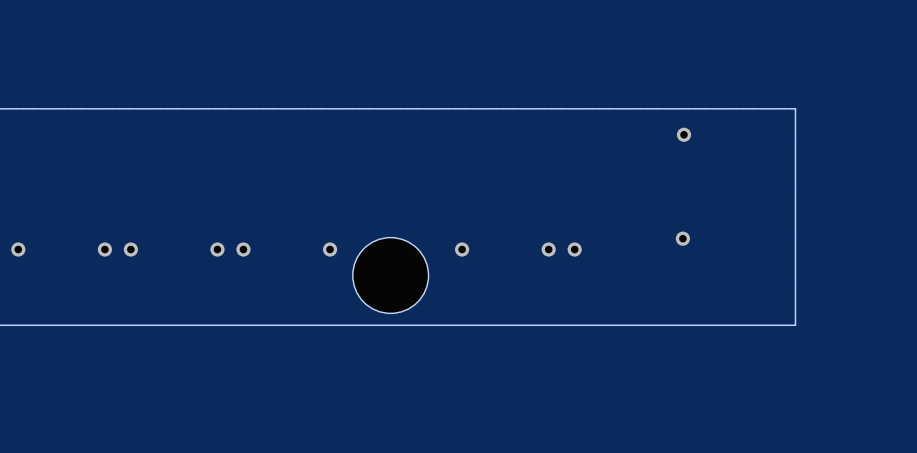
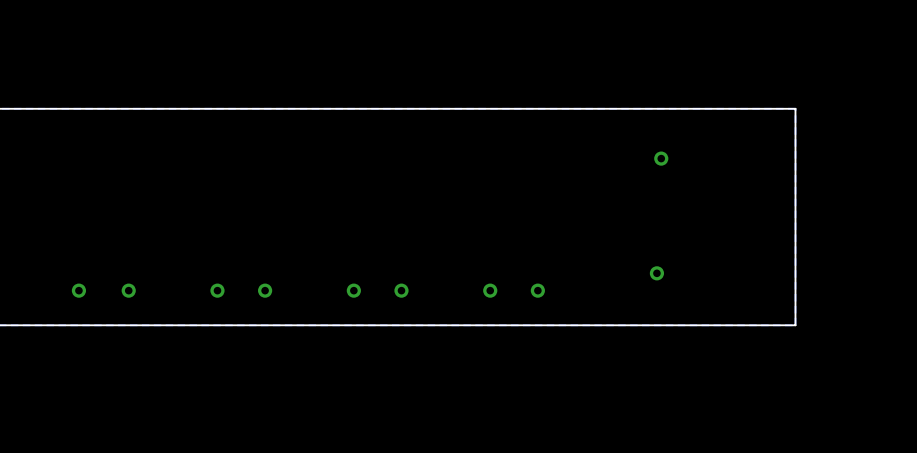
via position: (683, 134) -> (661, 158)
via: (682, 238) -> none
via: (18, 249) -> none
via: (104, 249) -> none
via: (130, 249) -> none
via: (217, 249) -> none
via: (243, 249) -> none
via: (330, 249) -> none
via: (462, 249) -> none
via: (548, 249) -> none
via: (574, 249) -> none
via: none -> (656, 273)
hole: (390, 275) -> none
via: none -> (78, 290)
via: none -> (128, 290)
via: none -> (217, 290)
via: none -> (265, 290)
via: none -> (353, 290)
via: none -> (401, 290)
via: none -> (490, 290)
via: none -> (537, 290)

